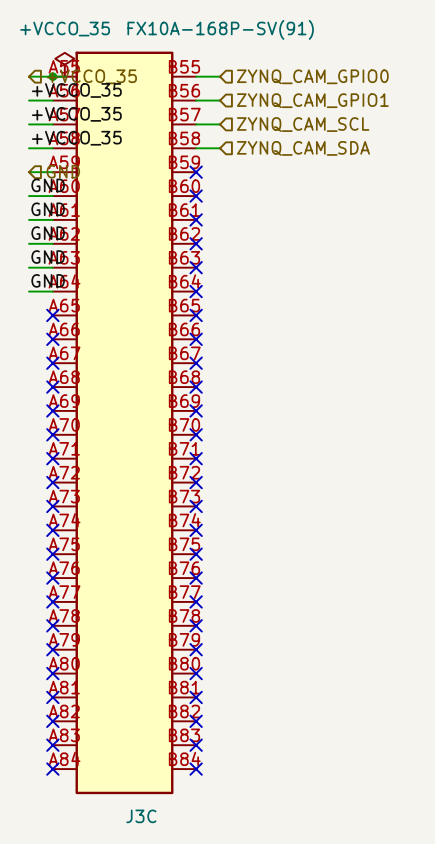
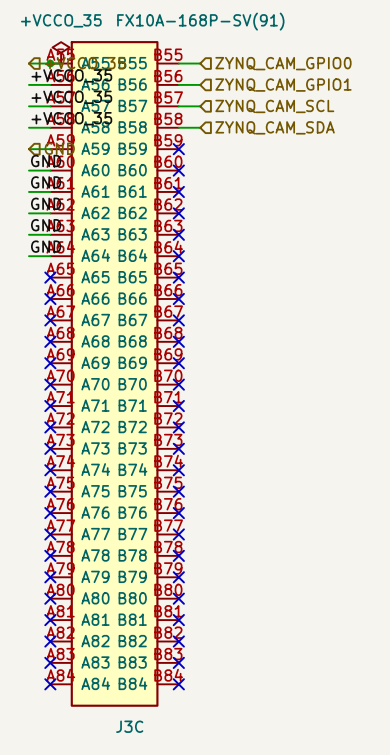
J3C symbol: [52, 51, 197, 795] -> [50, 41, 179, 707]

